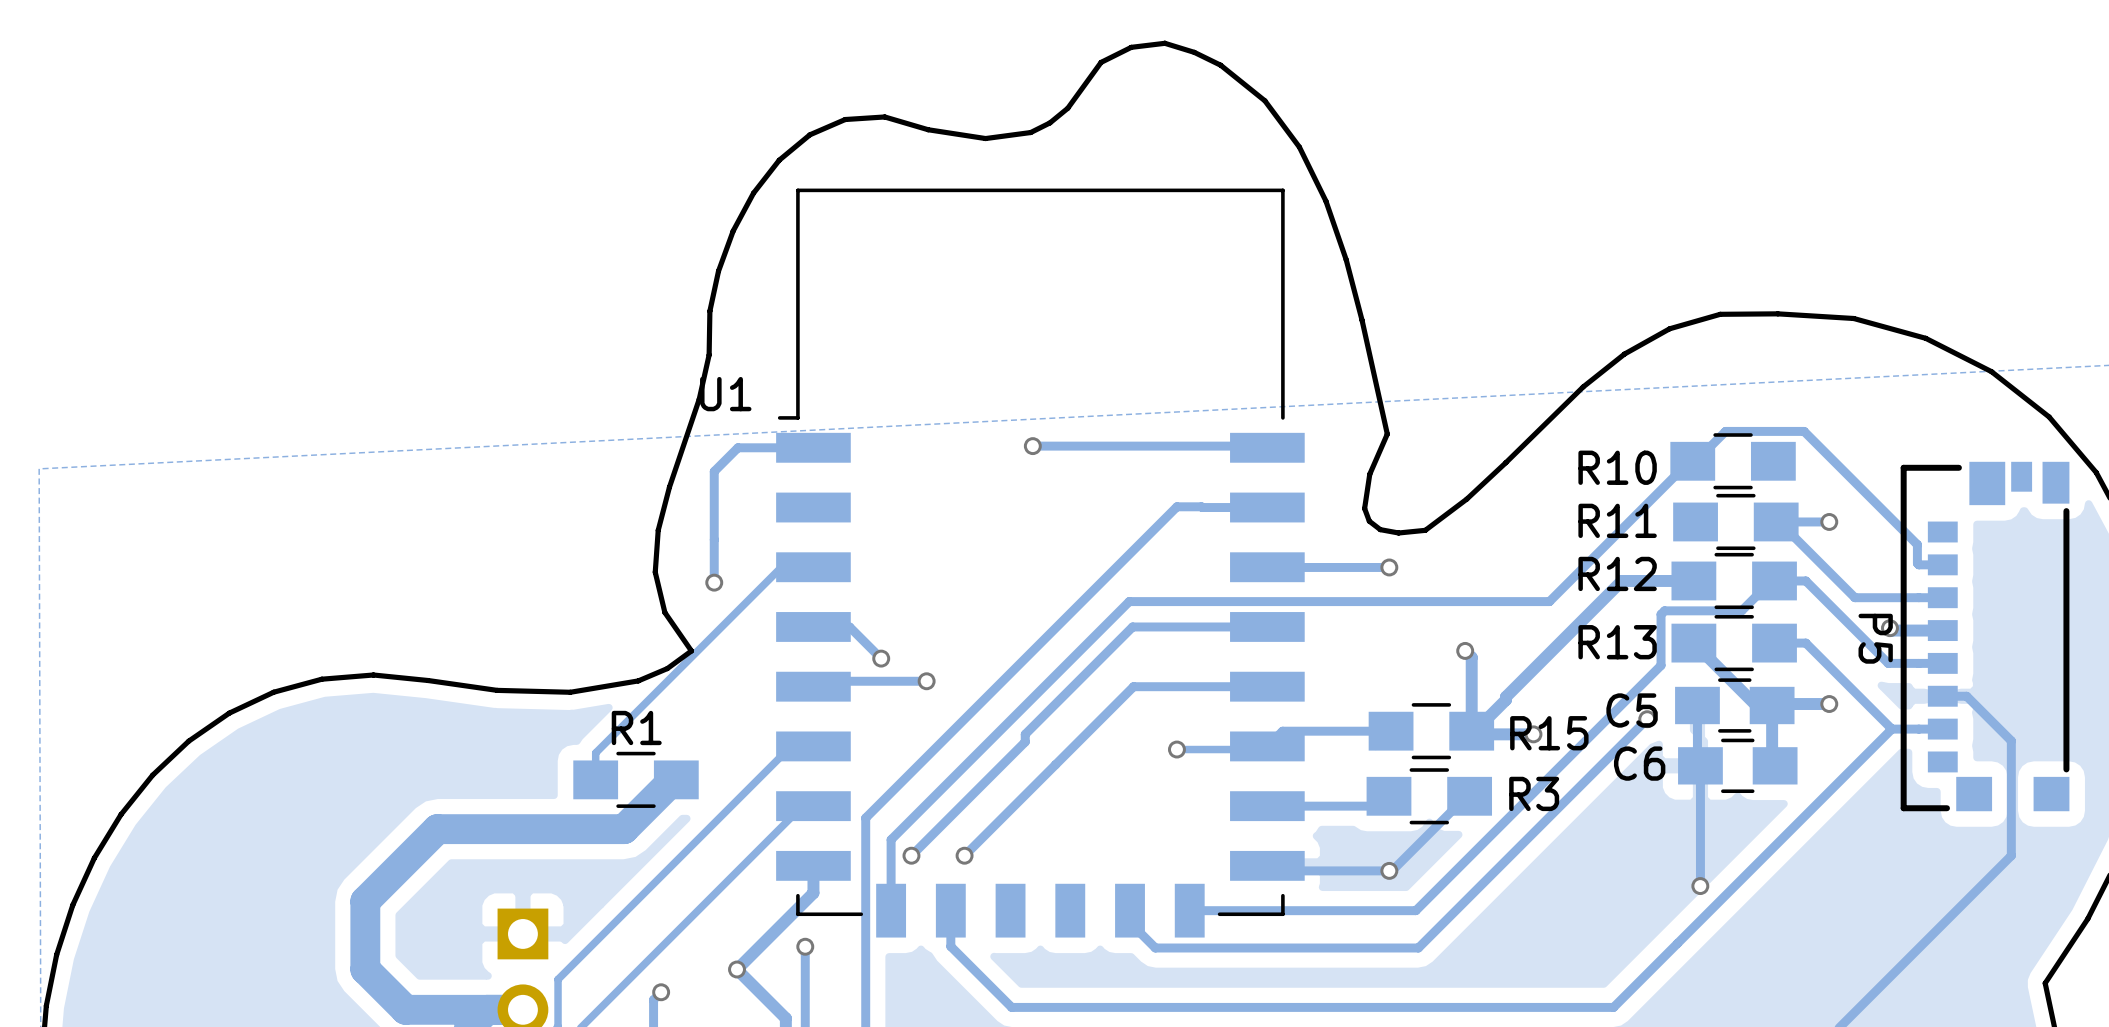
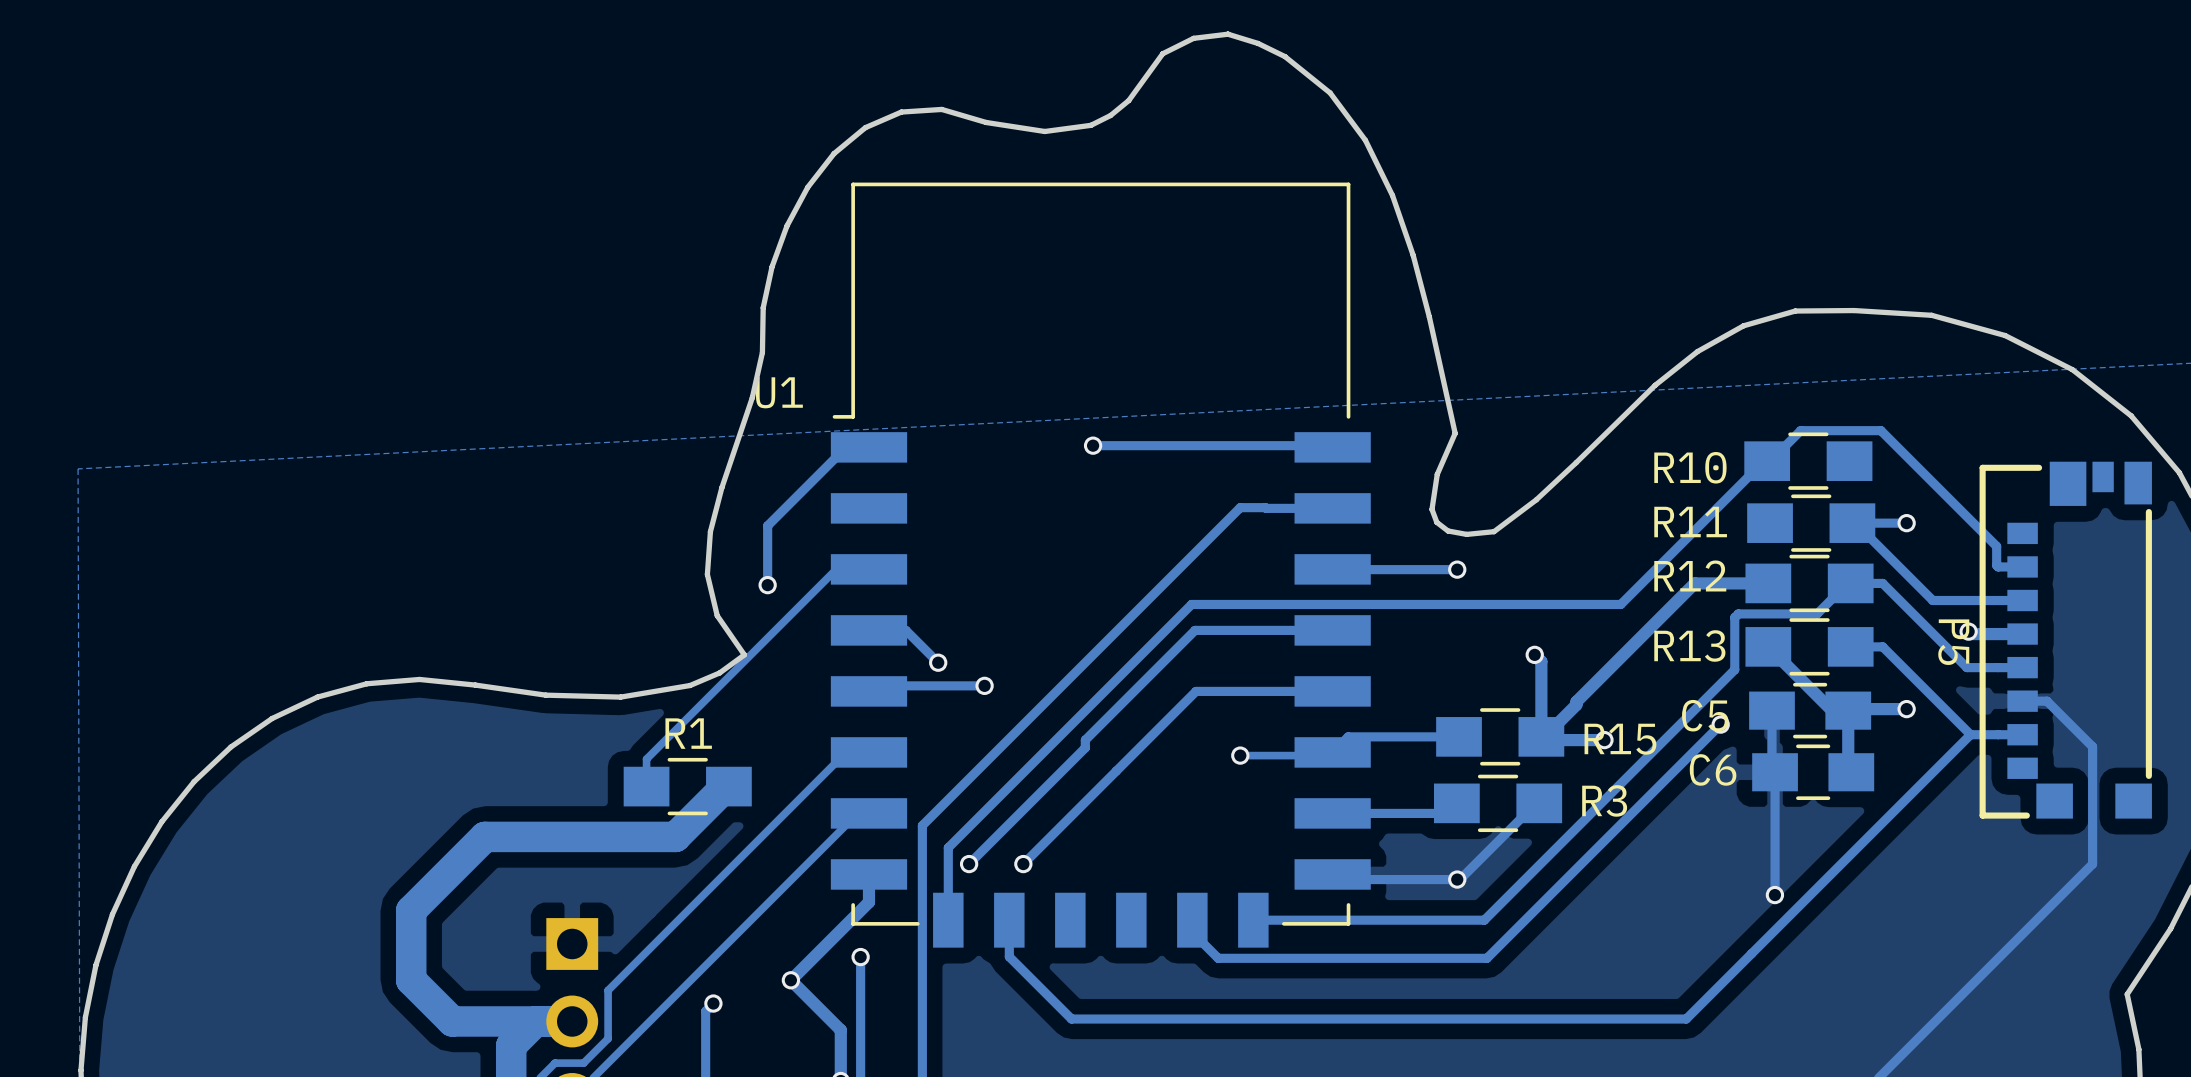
track: (791, 447) (737, 447) (714, 471) (714, 524) -> (846, 447) (767, 525)

